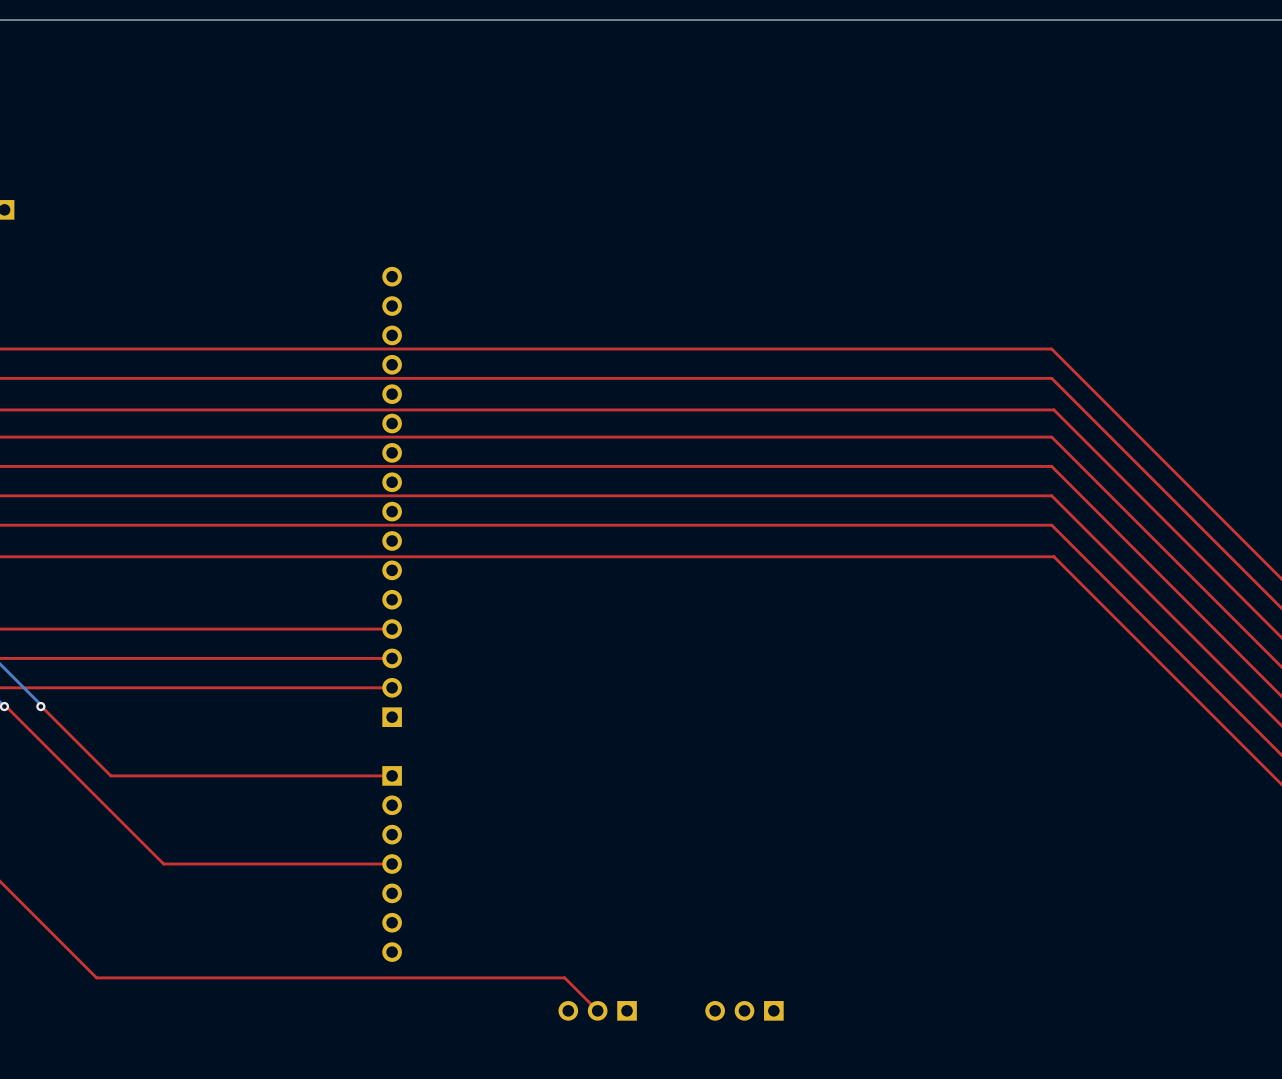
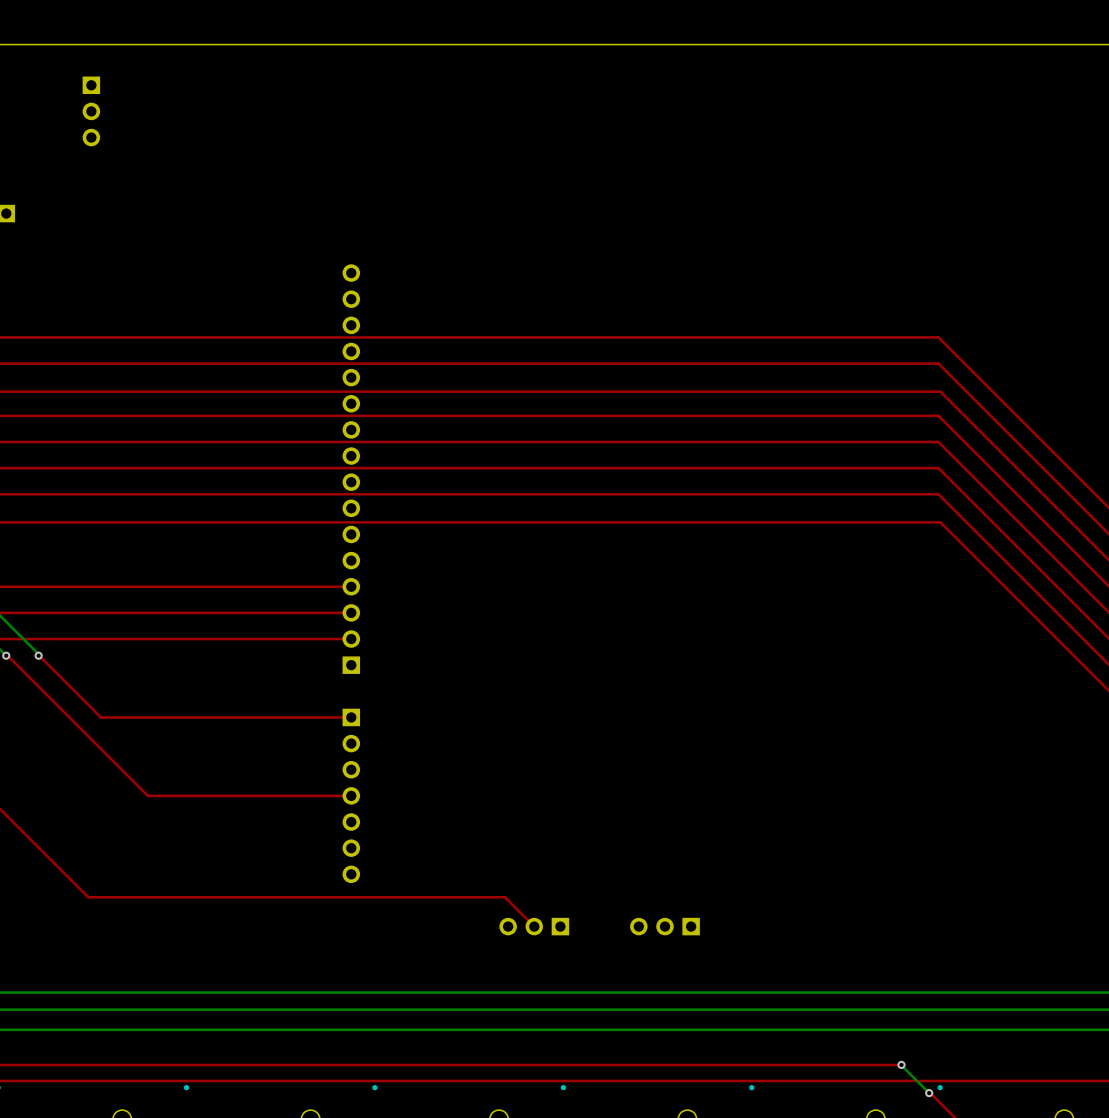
part: none -> (91, 111)

